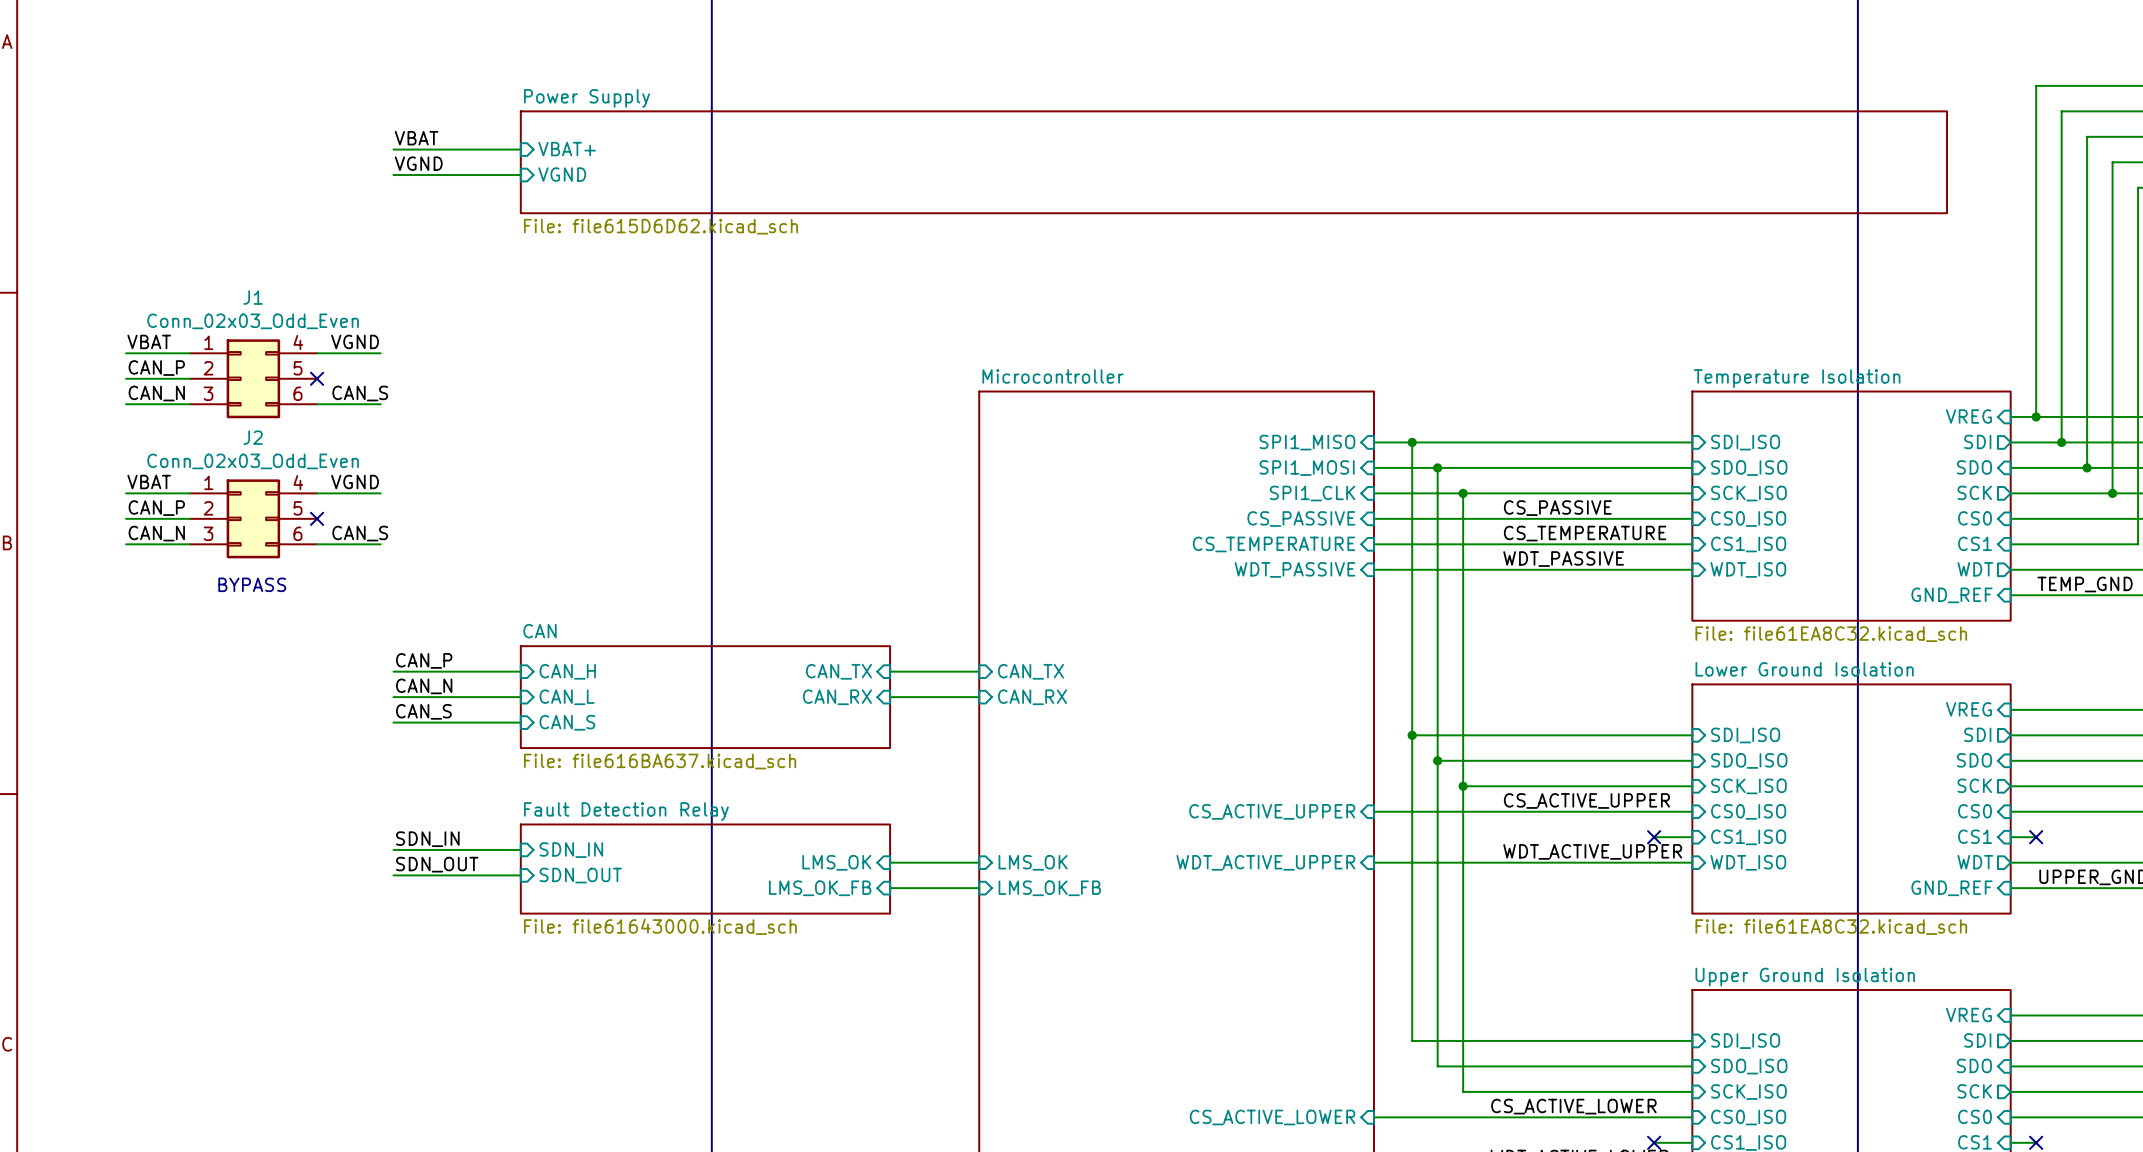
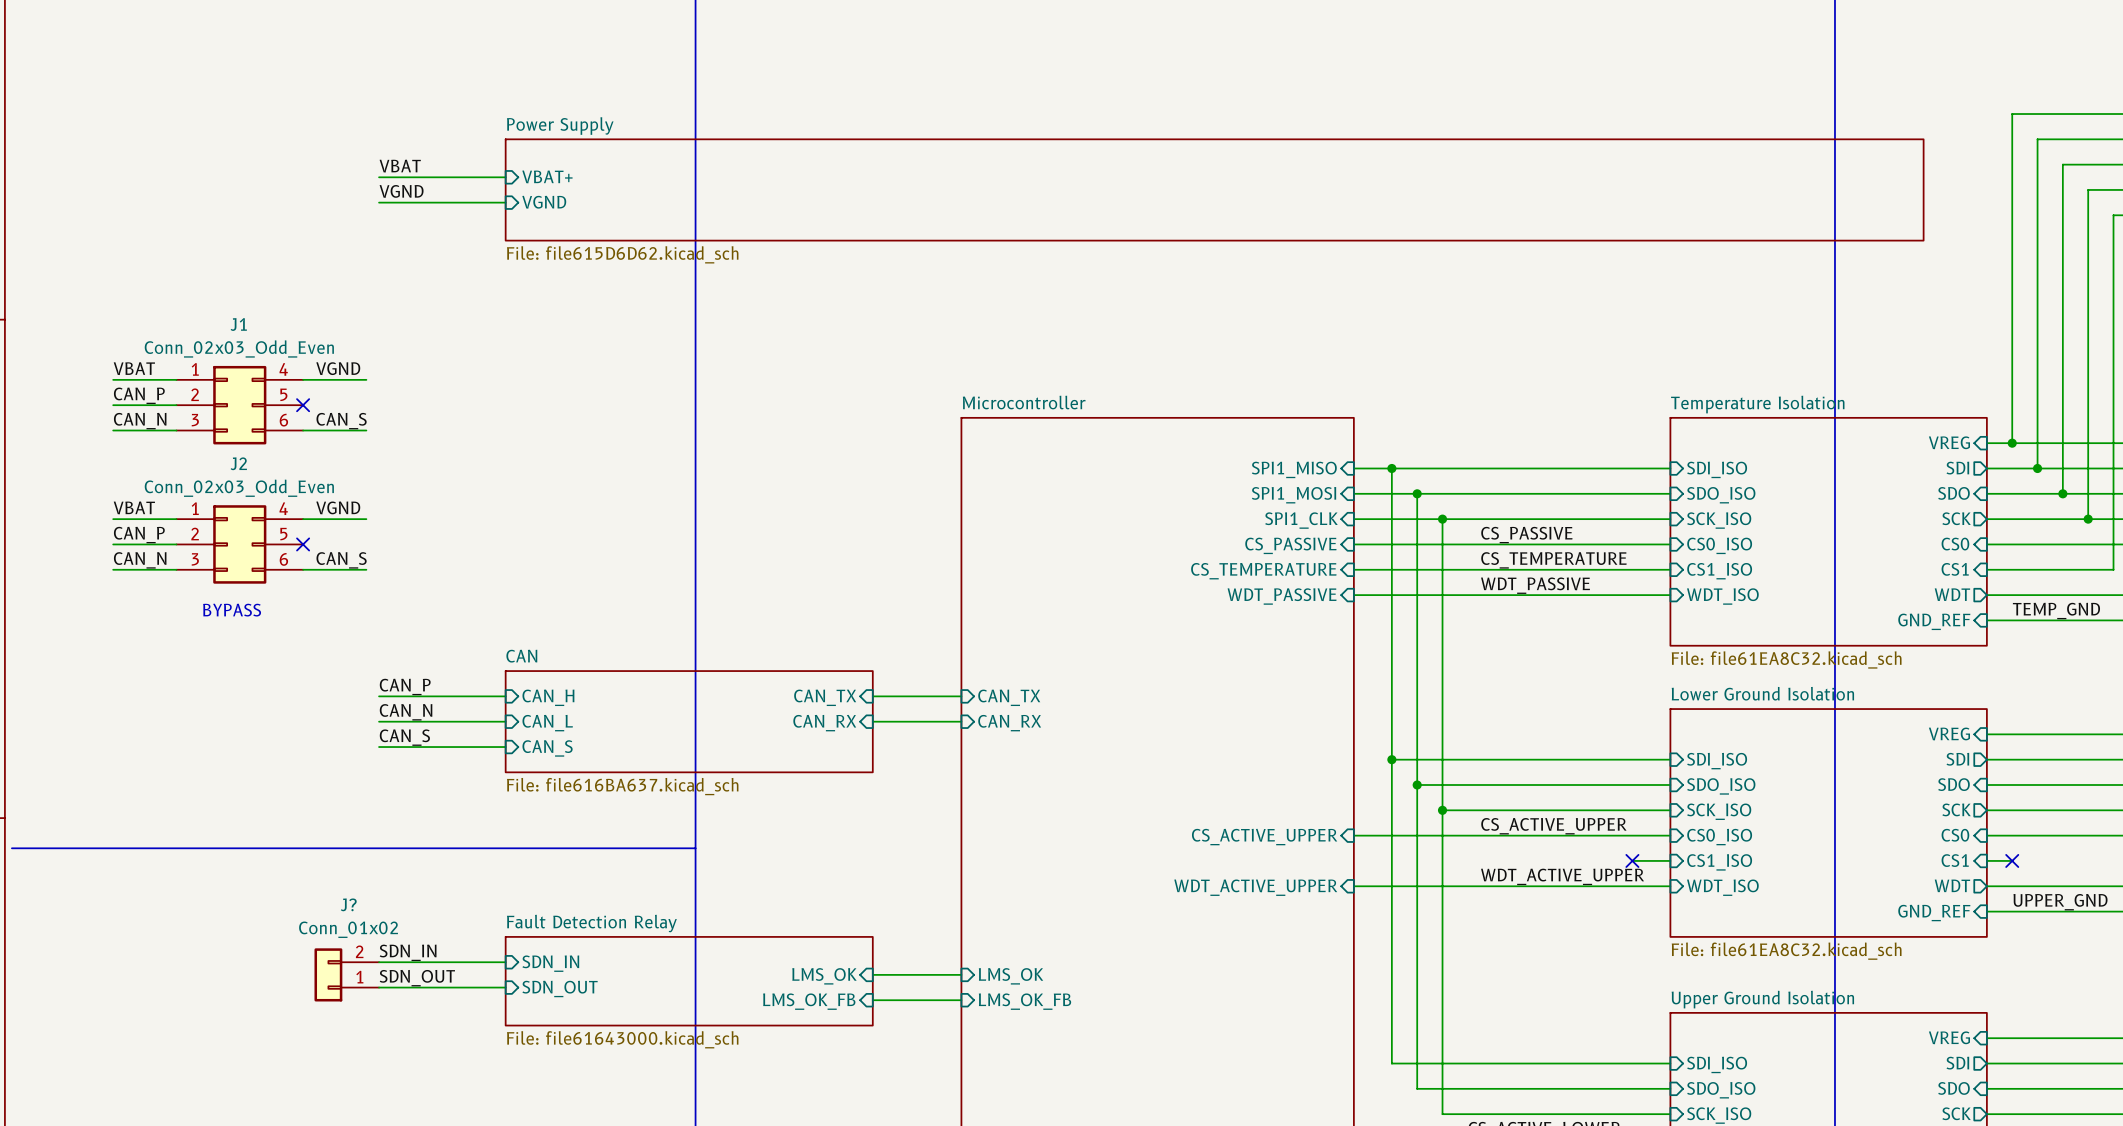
line: none -> (11, 848) (695, 848)
label position: SDN_IN (427, 839) -> SDN_IN (408, 952)
wire: (393, 849) (520, 849) -> (379, 962) (505, 962)
sheet pin position: SDN_IN (571, 850) -> SDN_IN (550, 963)
sheet pin: LMS_OK (836, 862) -> none
wire: (890, 862) (979, 862) -> (872, 974) (961, 974)
sheet pin: LMS_OK (1033, 862) -> none
label position: SDN_OUT (437, 864) -> SDN_OUT (417, 978)
sheet Fault Detection Relay position: (705, 869) -> (689, 981)
wire: (393, 875) (520, 875) -> (379, 987) (505, 987)
sheet pin position: SDN_OUT (580, 875) -> SDN_OUT (560, 988)
sheet pin: LMS_OK_FB (820, 888) -> none
wire: (890, 888) (979, 888) -> (872, 1000) (961, 1000)
sheet pin: LMS_OK_FB (1049, 888) -> none
J?: none -> Conn_01x02 (346, 974)
sheet pin: none -> LMS_OK (824, 976)
sheet pin: none -> LMS_OK (1011, 976)
sheet pin: none -> LMS_OK_FB (809, 1001)
sheet pin: none -> LMS_OK_FB (1024, 1001)

